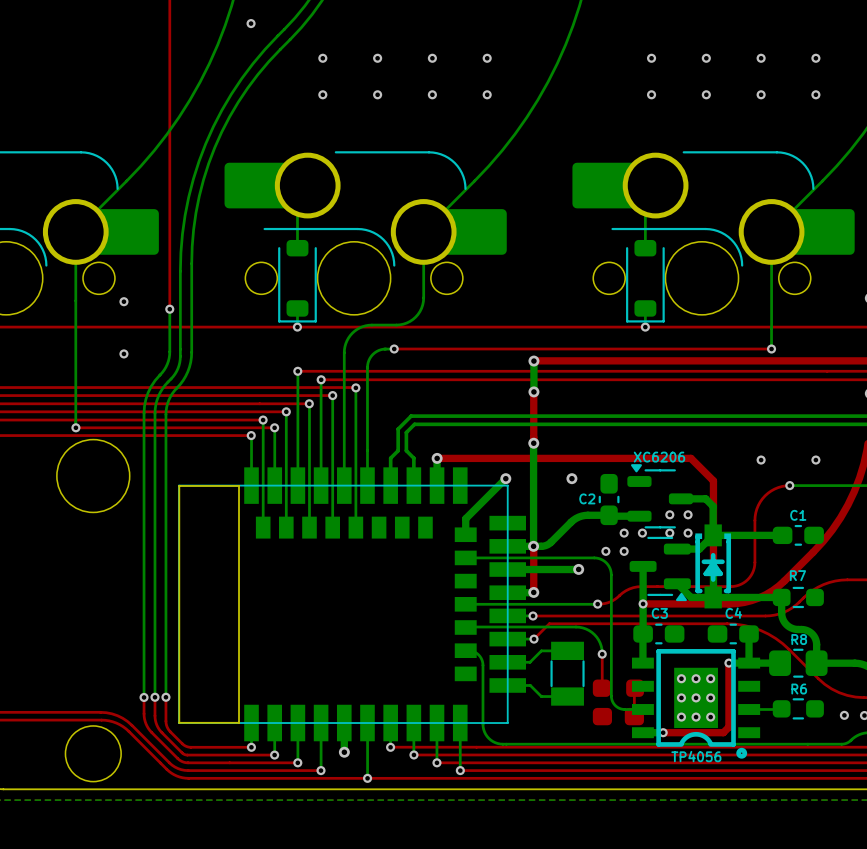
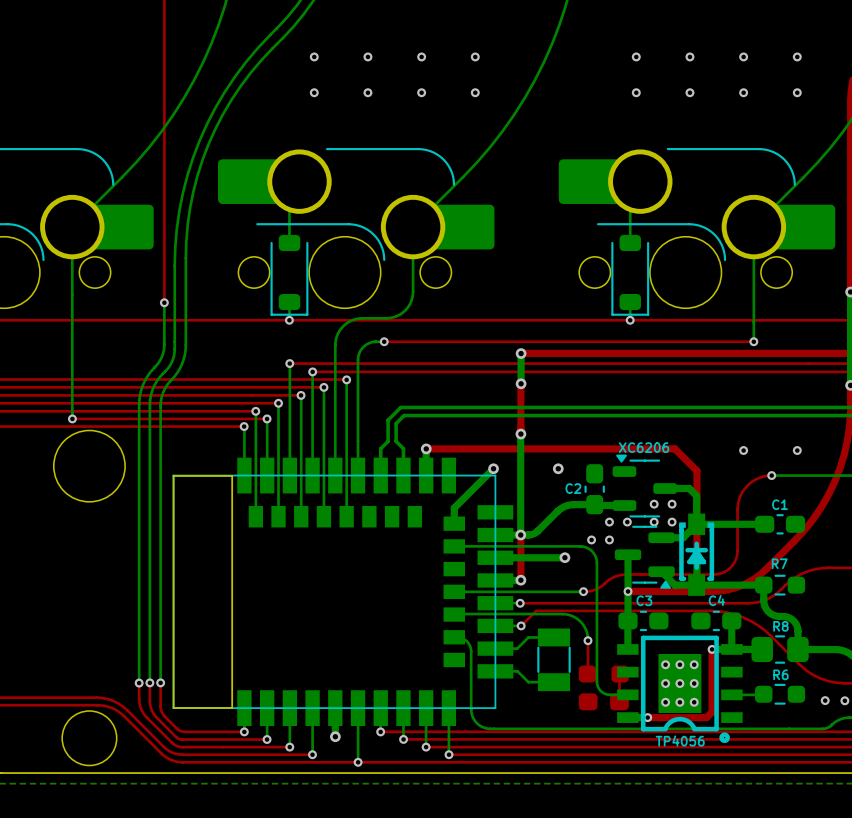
via: (251, 23) -> none
via: (123, 301) -> none
via: (123, 353) -> none

